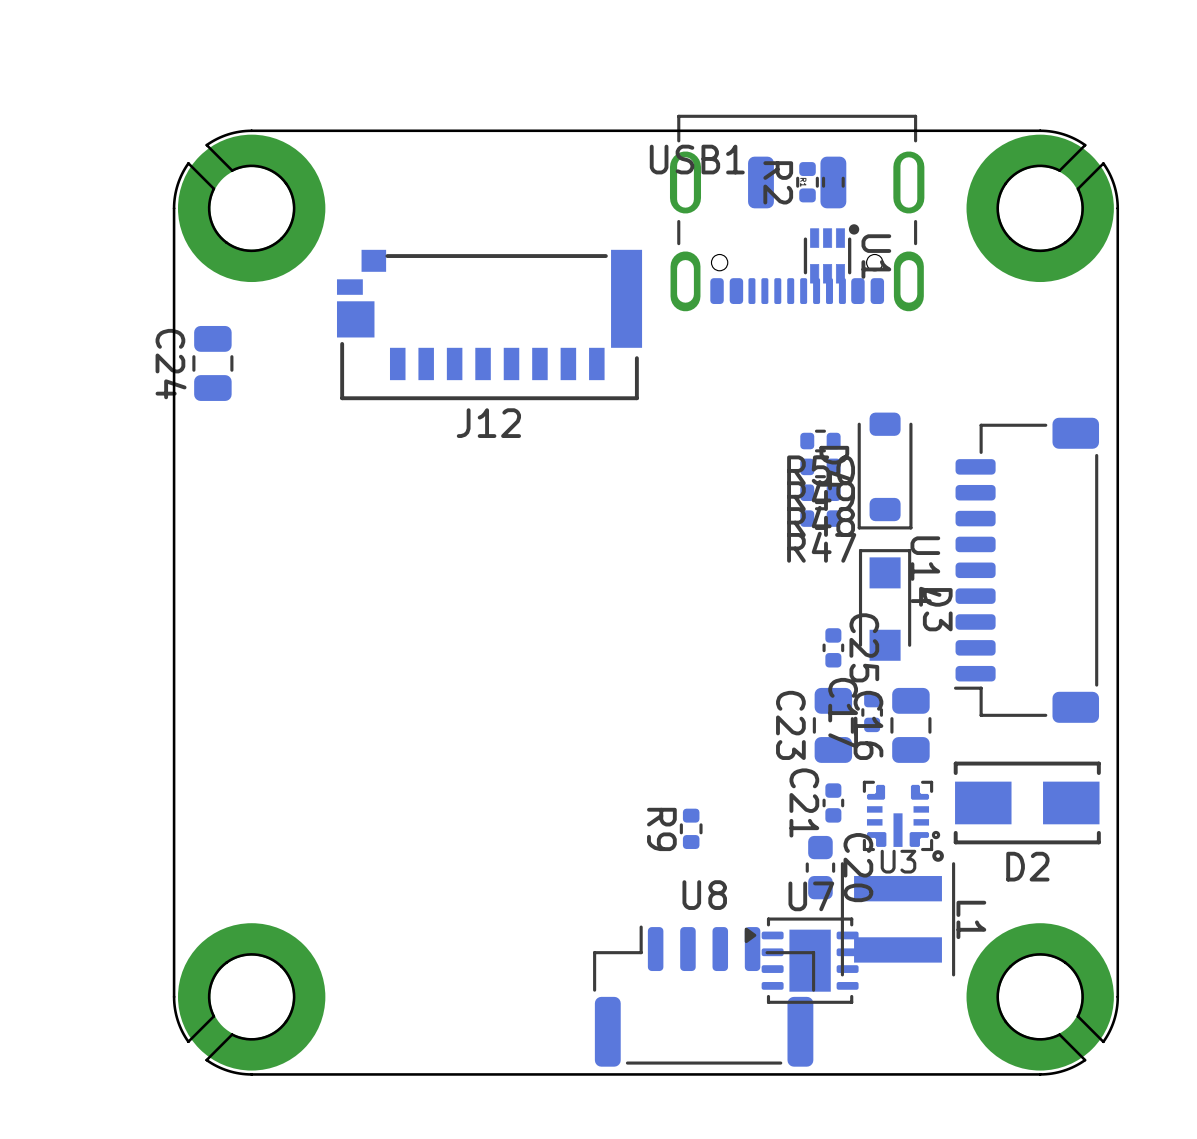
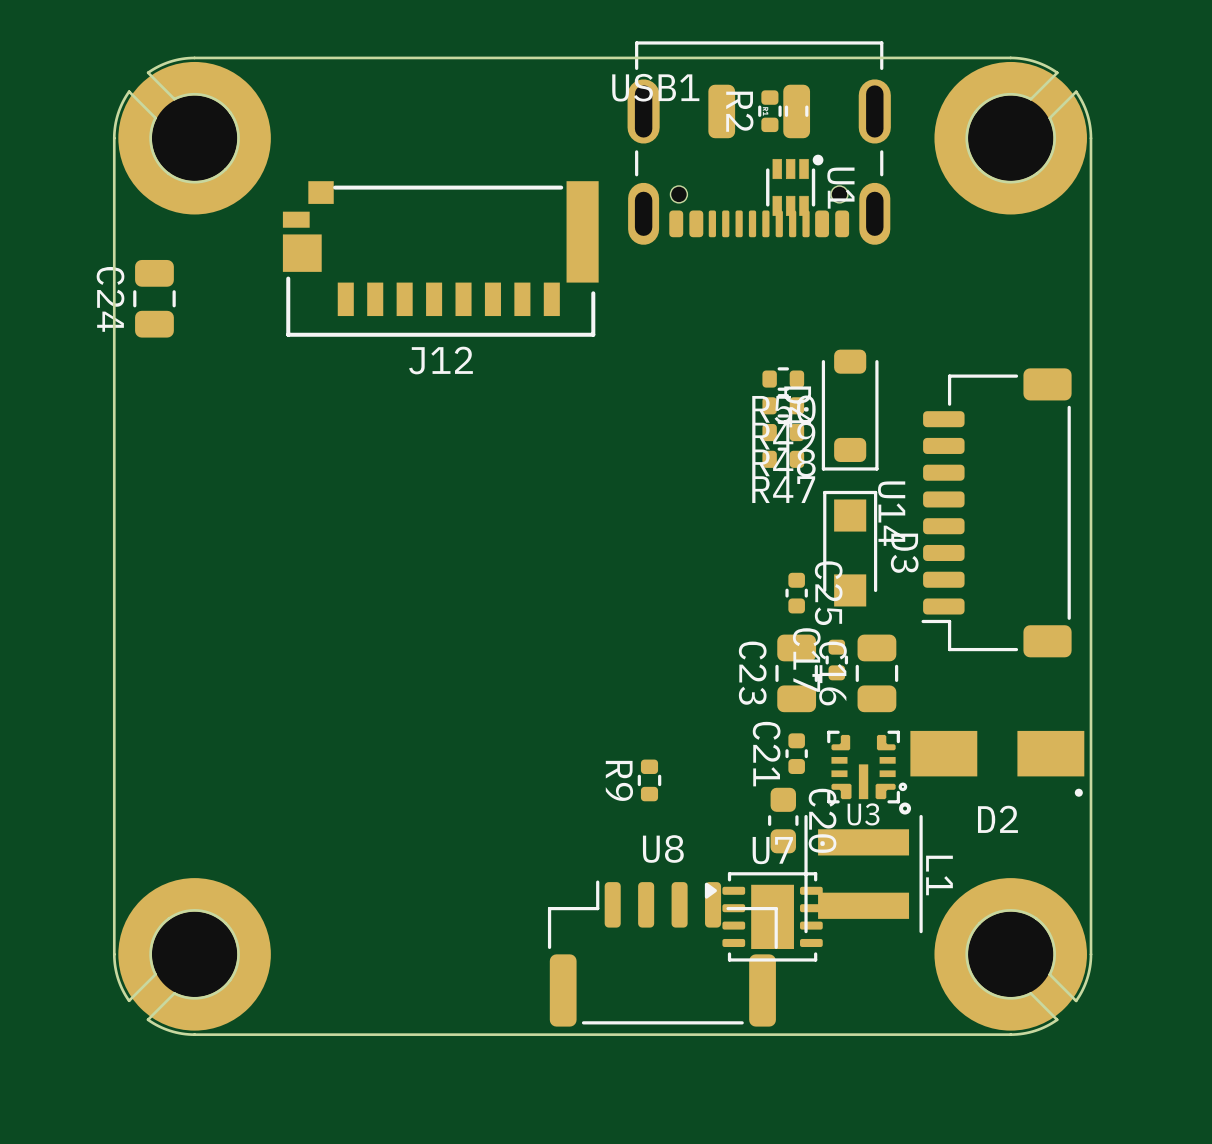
U14 footprint: [953, 417, 1100, 723] -> [921, 368, 1072, 658]
D2 footprint: [953, 761, 1101, 845] -> [910, 730, 1085, 797]

